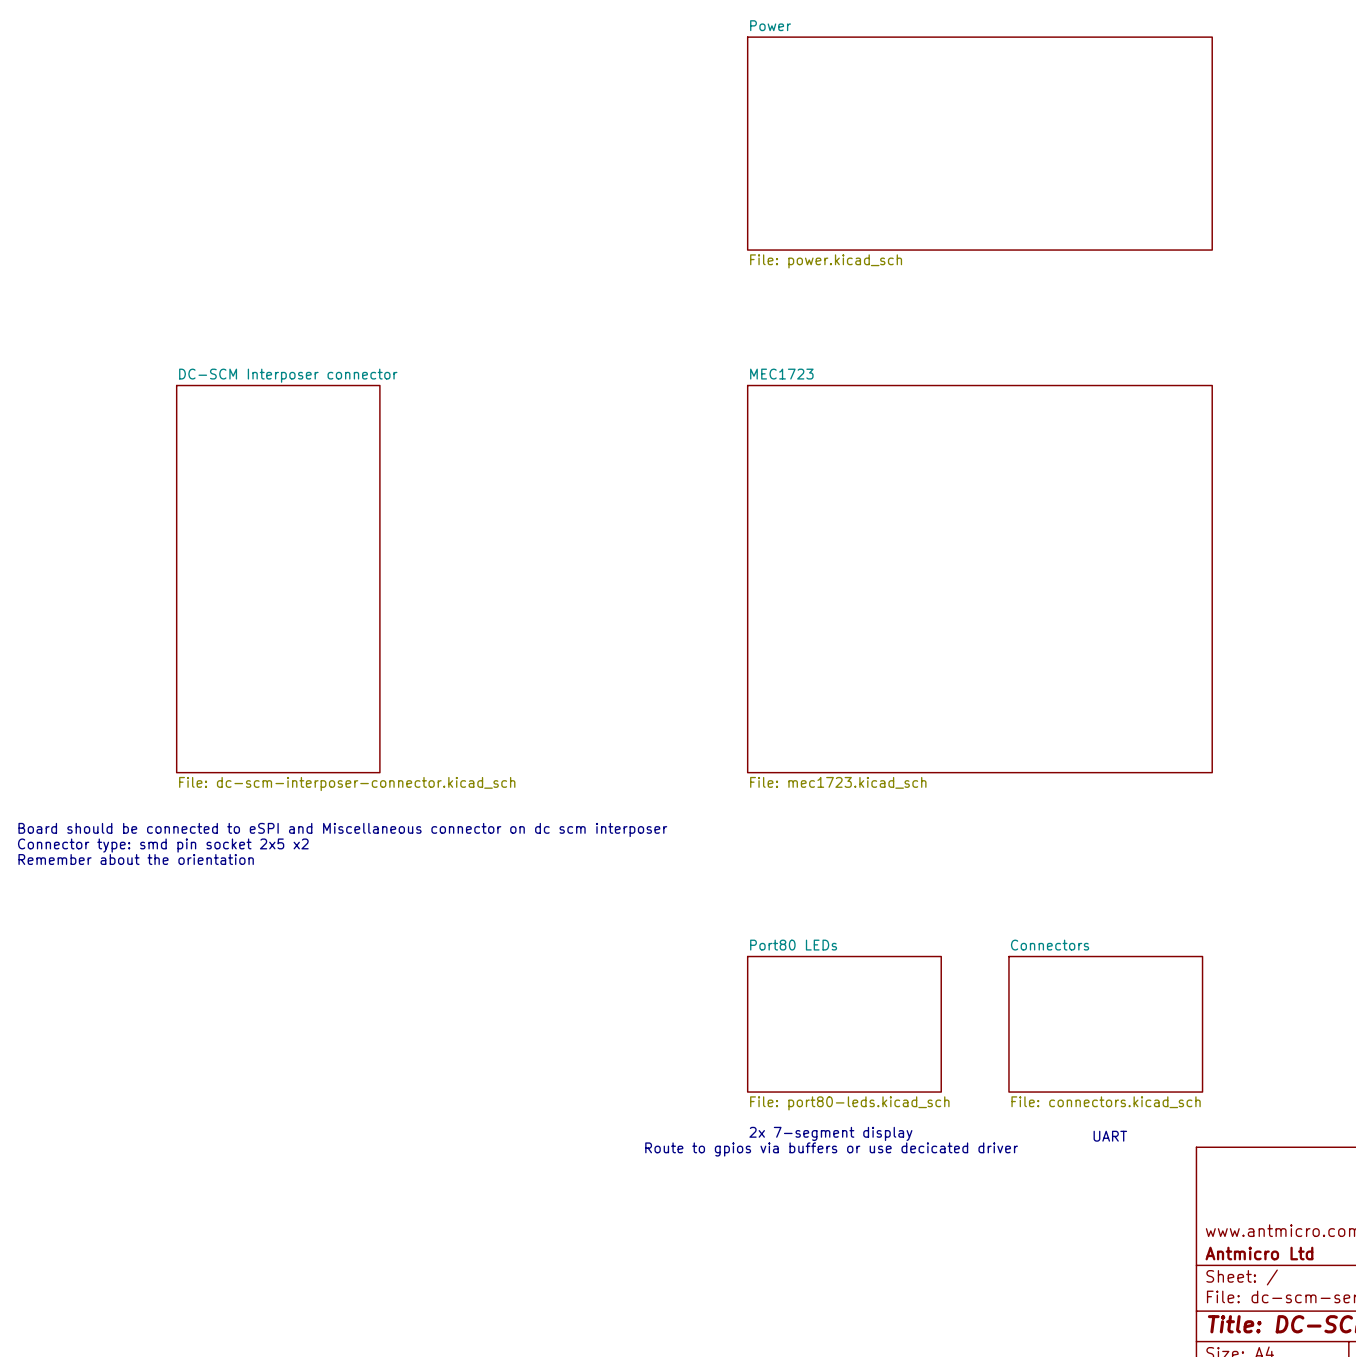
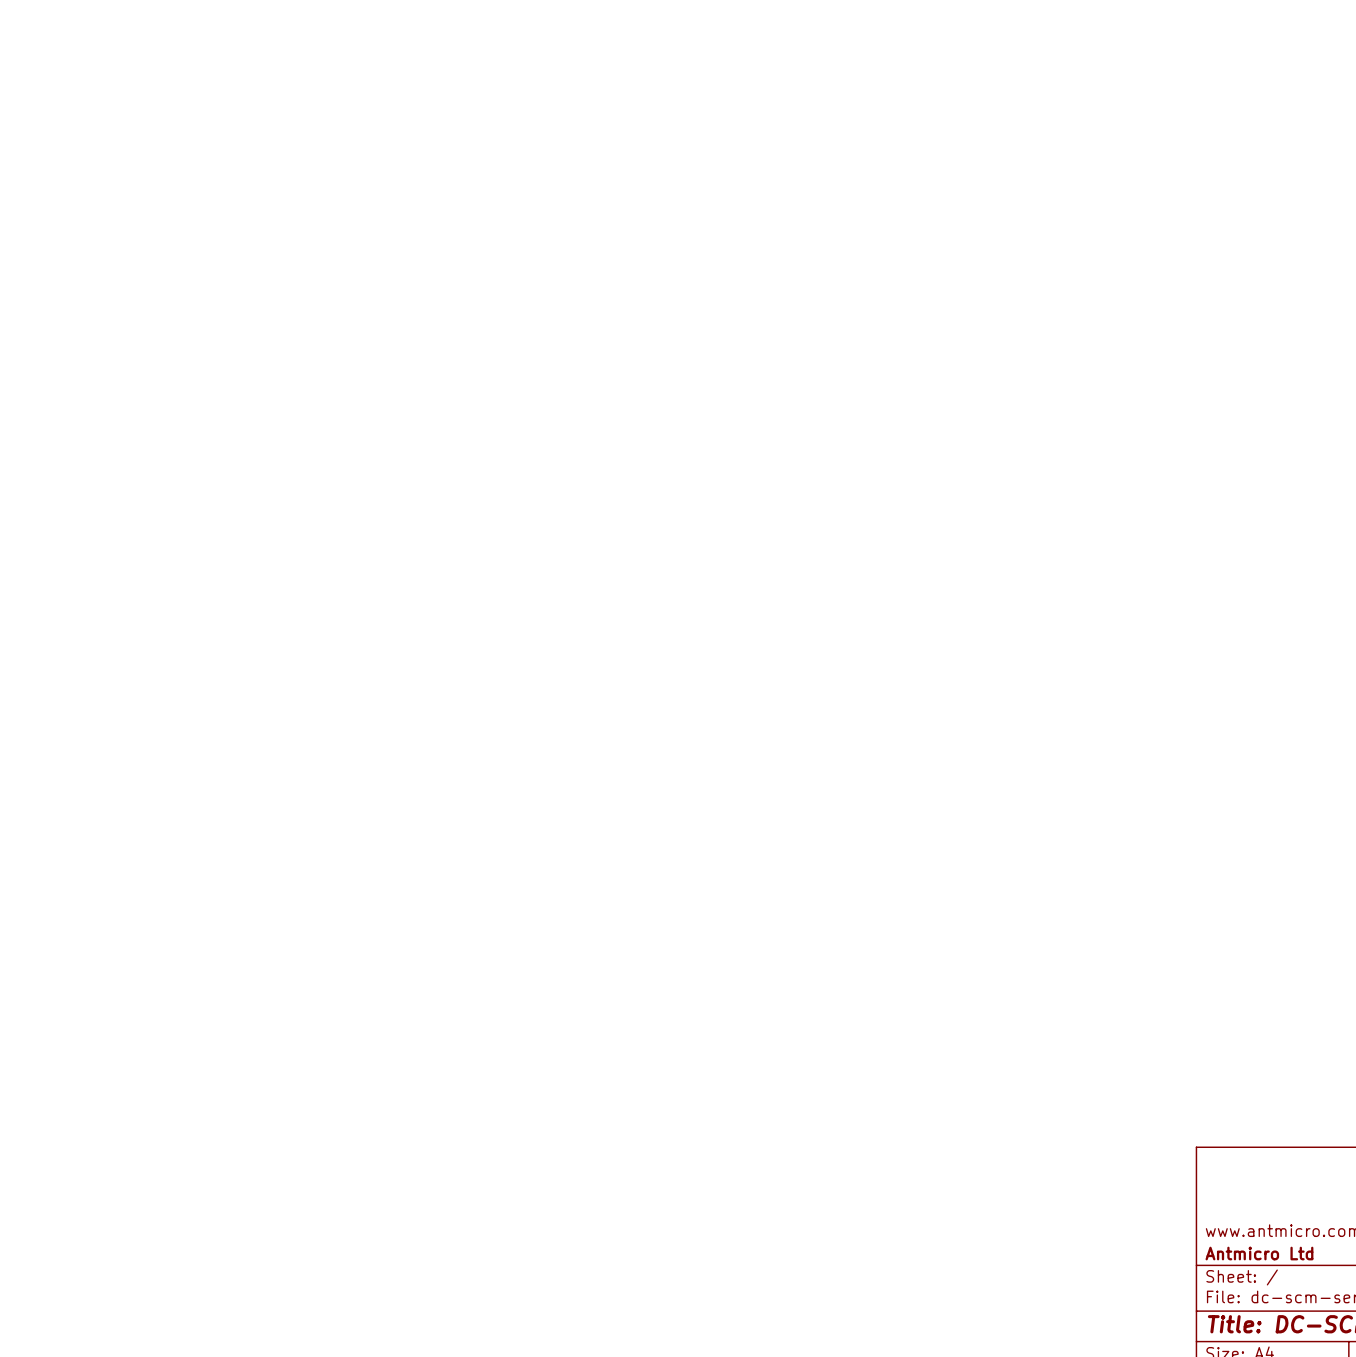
sheet Power: File: power.kicad_sch (979, 143) -> none
sheet DC-SCM Interposer connector: File: dc-scm-interposer-connector.kicad_sch (278, 579) -> none
sheet MEC1723: File: mec1723.kicad_sch (979, 579) -> none
text: Board should be connected to eSPI and Miscellaneous connector on dc scm interposer (342, 829) -> none
text: Connector type: smd pin socket 2x5 x2 (163, 845) -> none
text: Remember about the orientation (136, 859) -> none
sheet Port80 LEDs: File: port80-leds.kicad_sch (844, 1024) -> none
sheet Connectors: File: connectors.kicad_sch (1105, 1024) -> none
text: 2x 7-segment display (830, 1133) -> none
text: UART (1110, 1136) -> none
text: Route to gpios via buffers or use decicated driver (831, 1149) -> none

